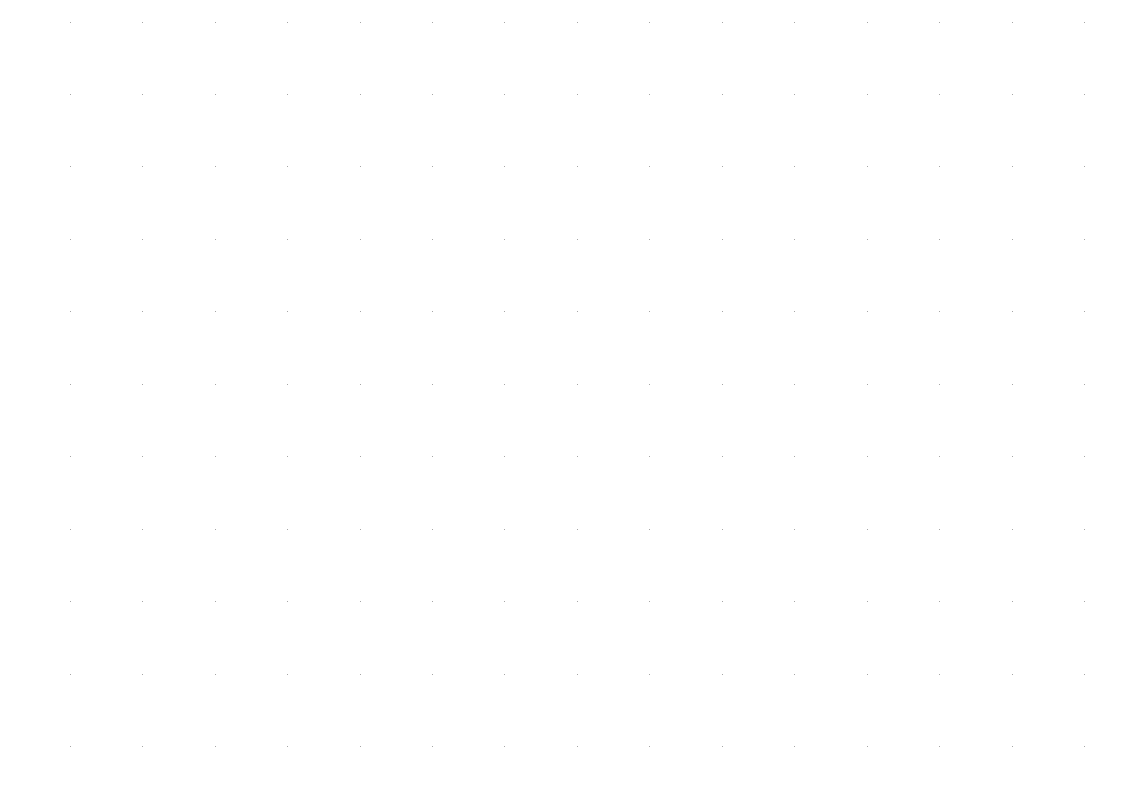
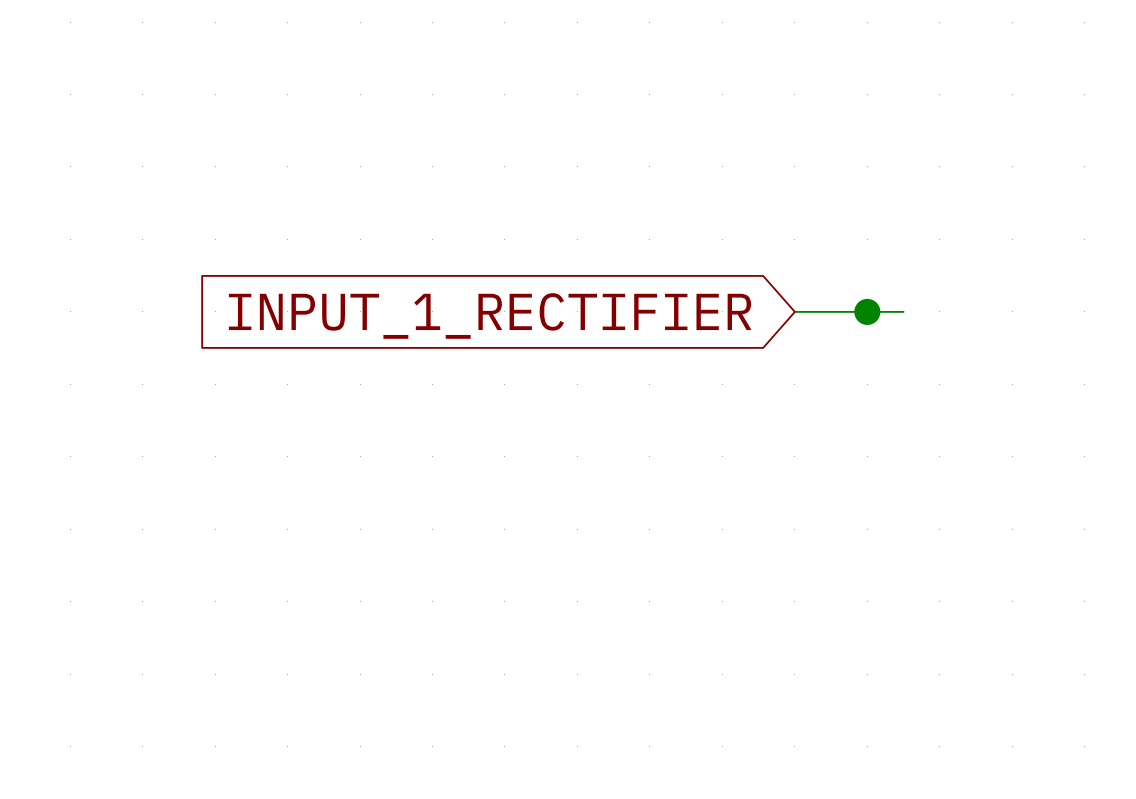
wire: none -> (794, 311) (903, 311)
junction: none -> (867, 311)
global label: none -> INPUT_1_RECTIFIER (490, 315)

